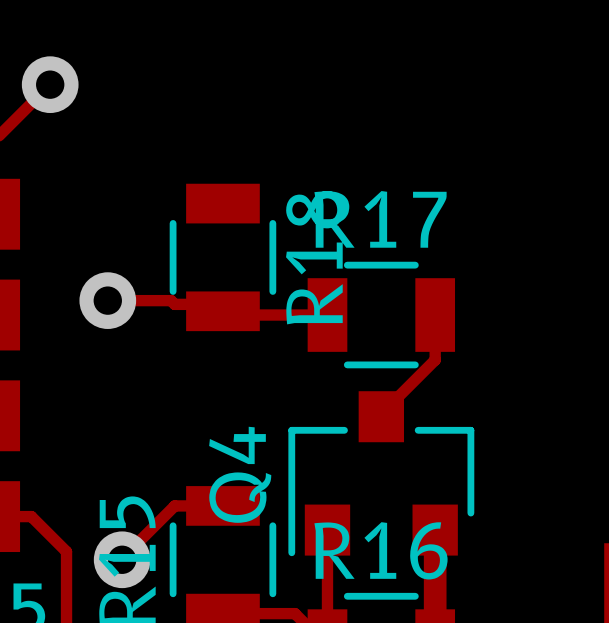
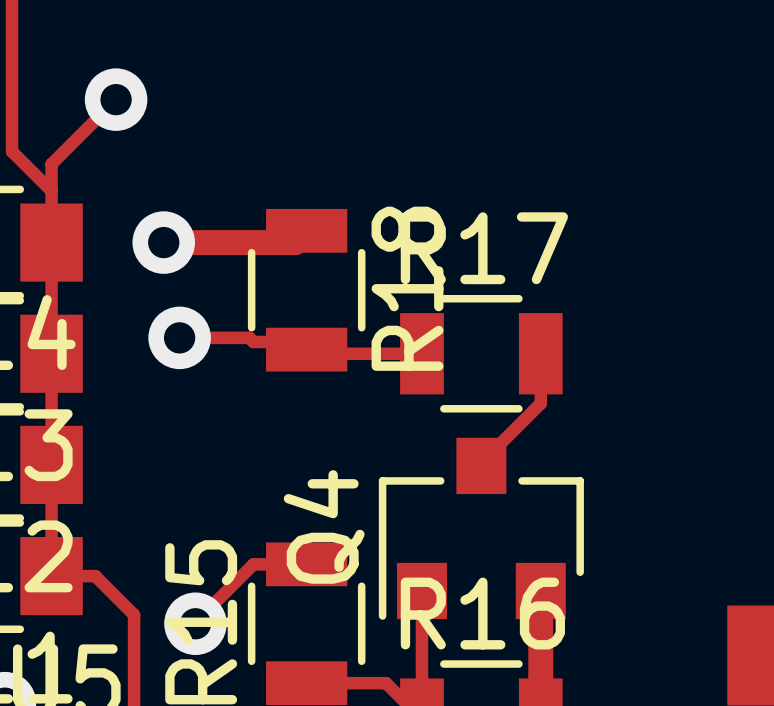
track: none -> (306, 230) (294, 242) (163, 242)
via: none -> (163, 242)

